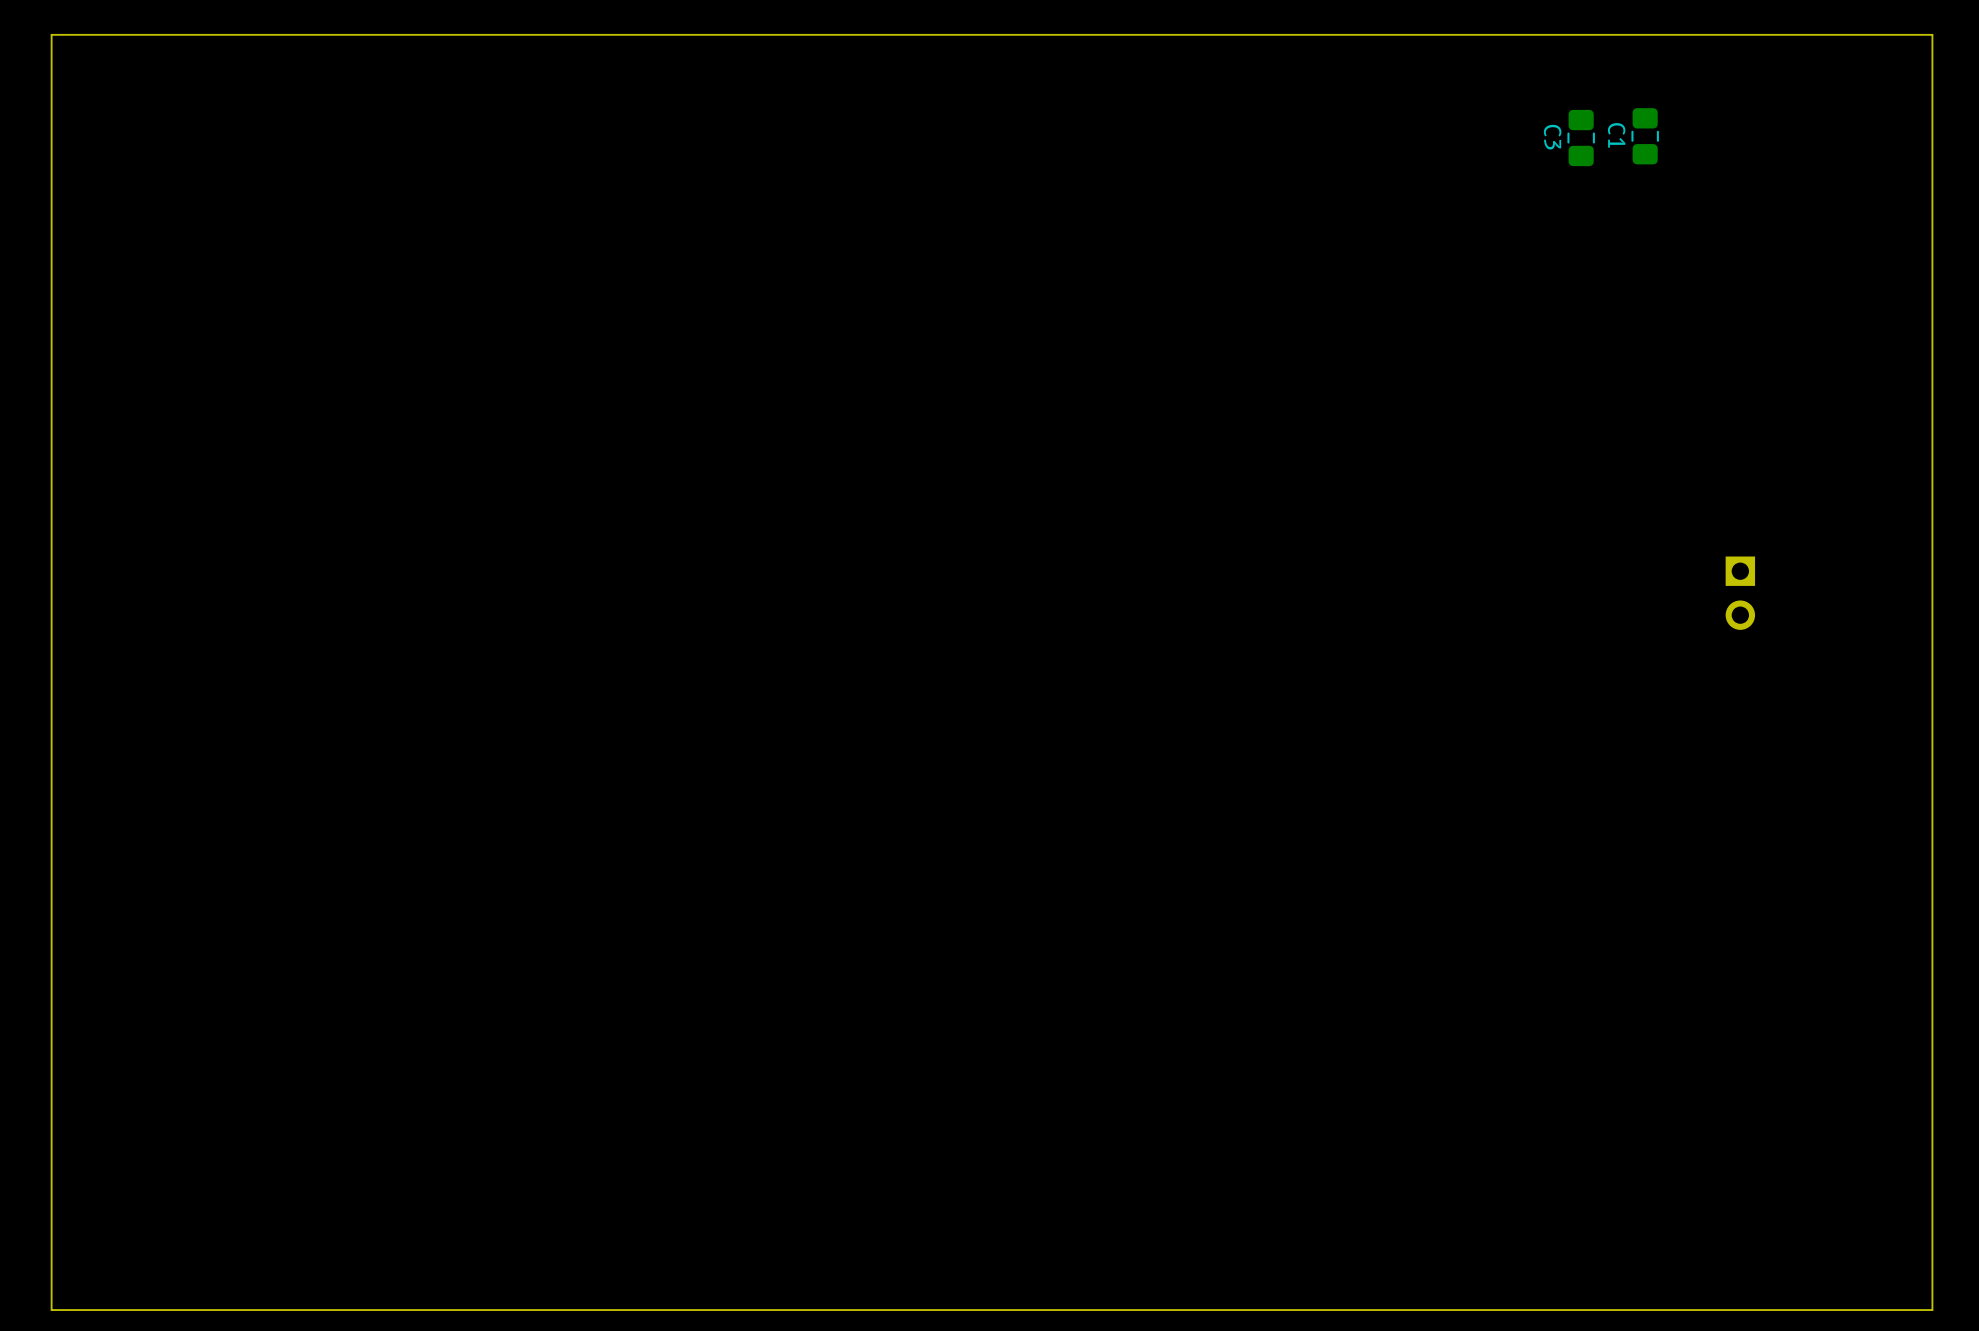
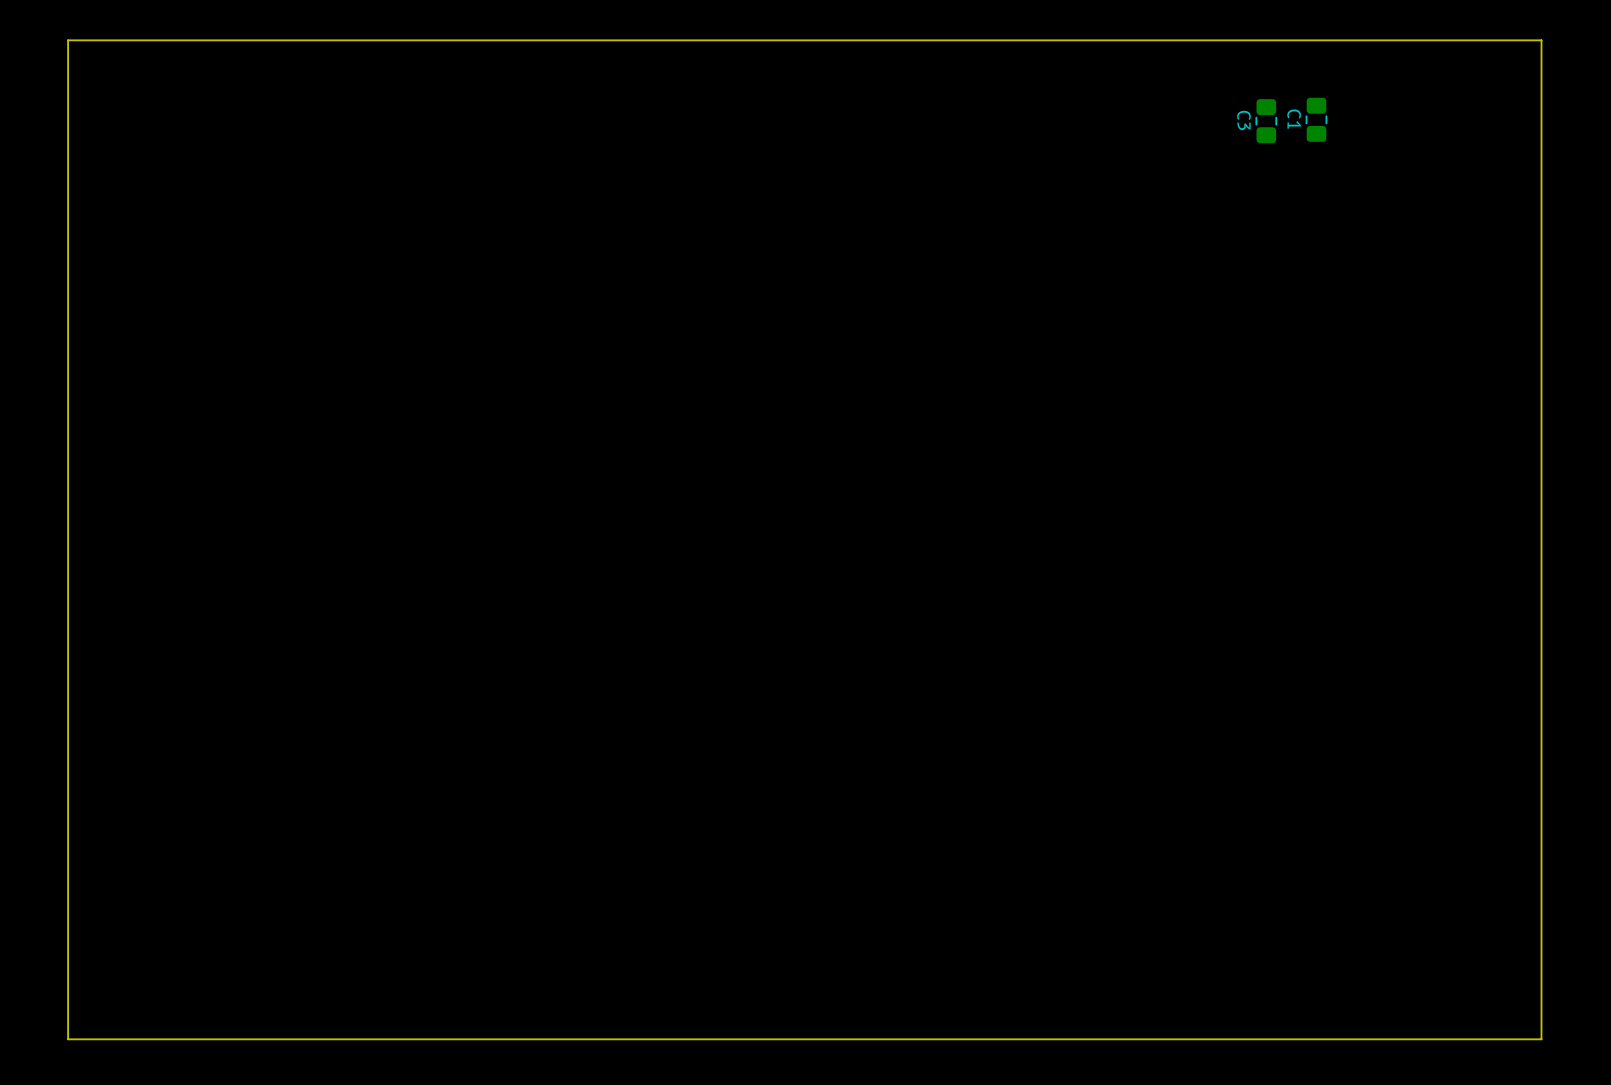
part: (1740, 593) -> none

